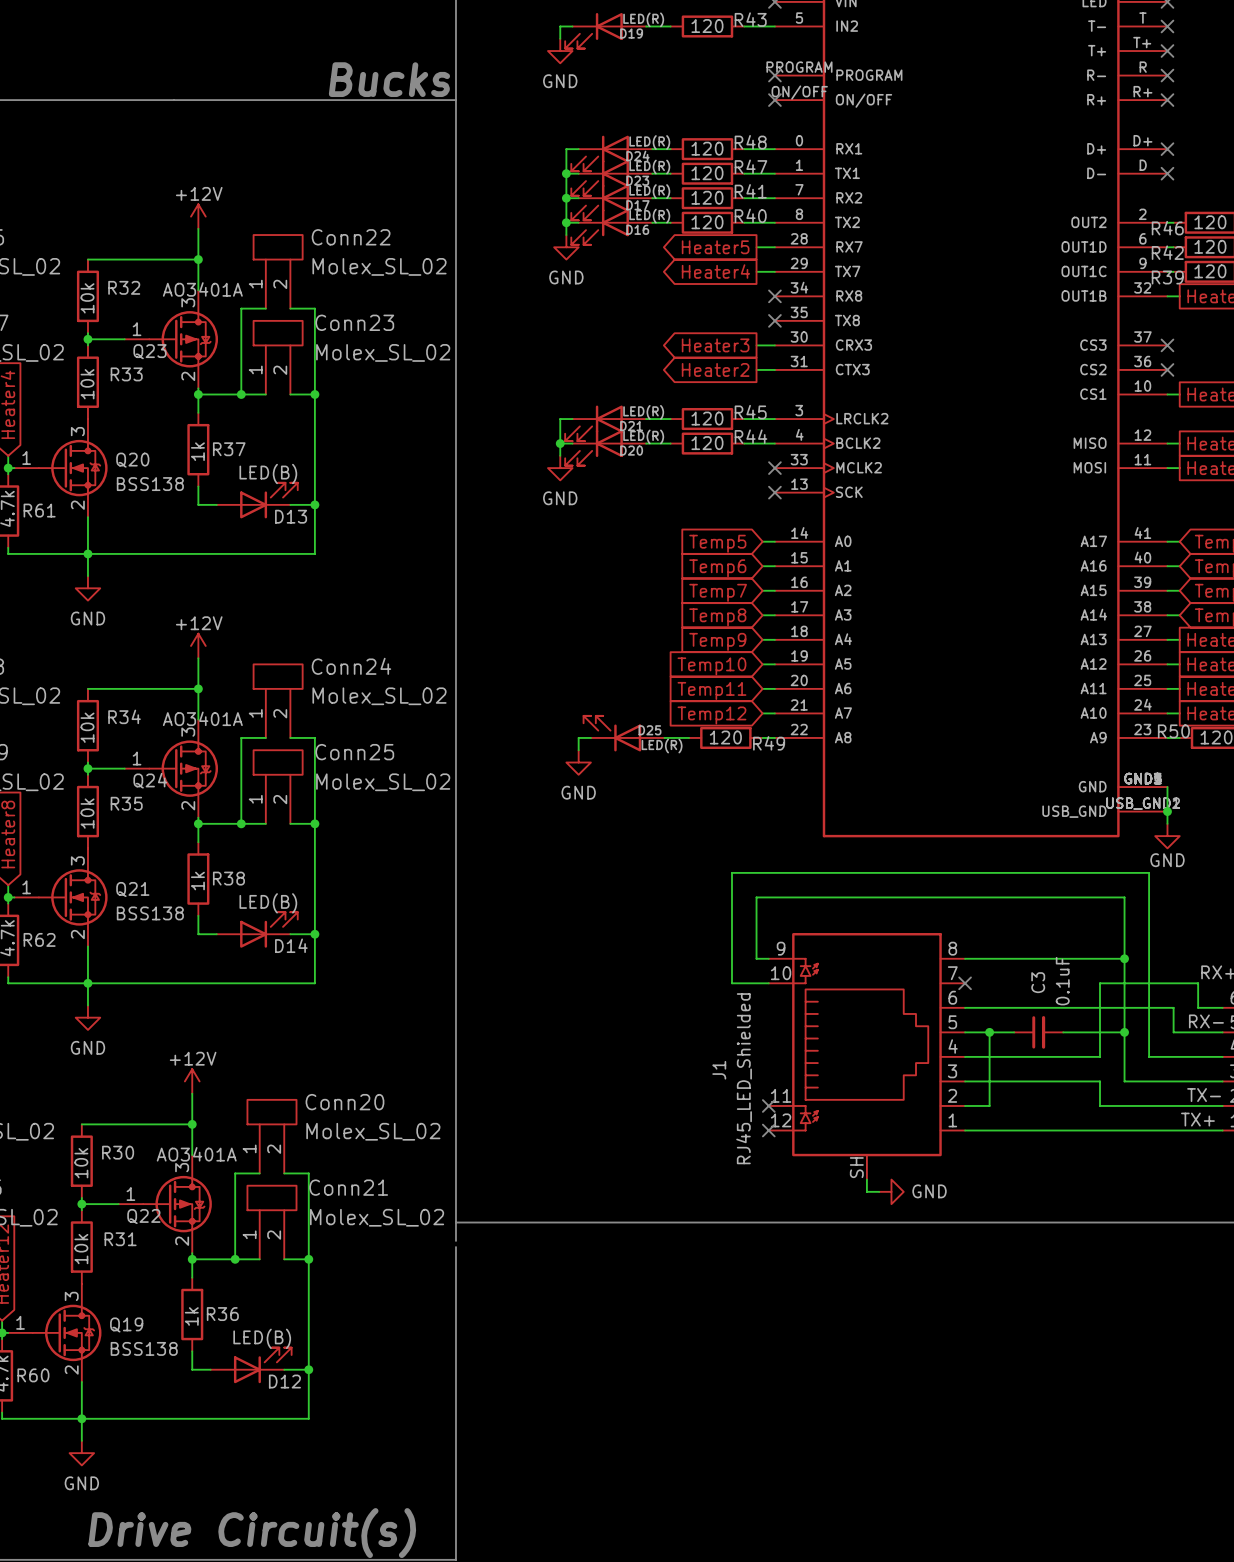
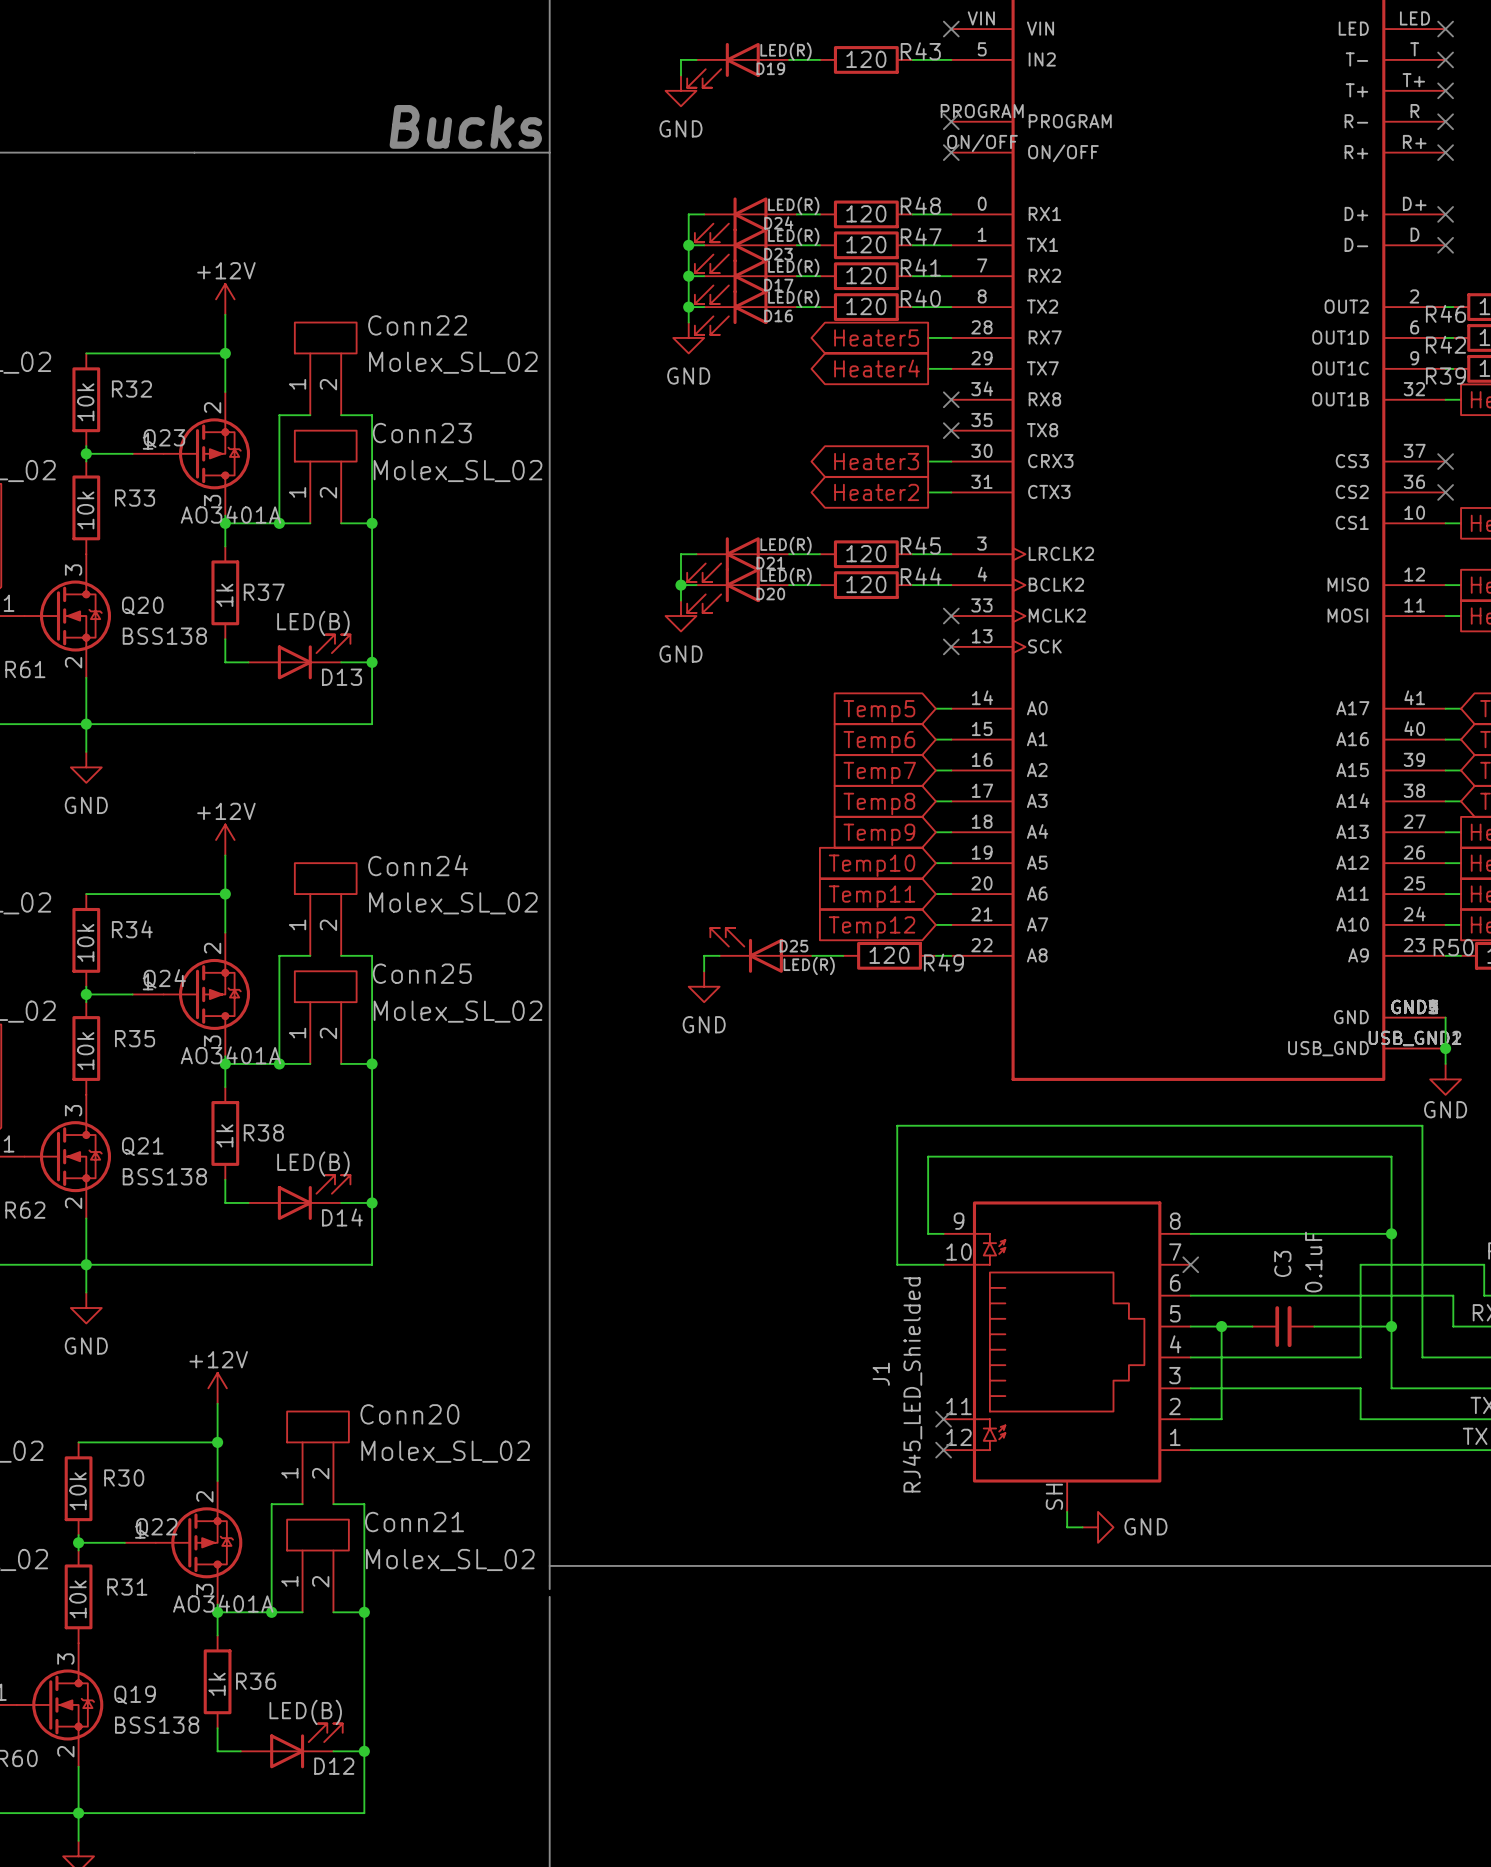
Q23 flip: as is (183, 339) -> up-down (206, 453)
Q24 flip: as is (183, 768) -> up-down (206, 994)
Q22 flip: as is (177, 1204) -> up-down (199, 1542)

